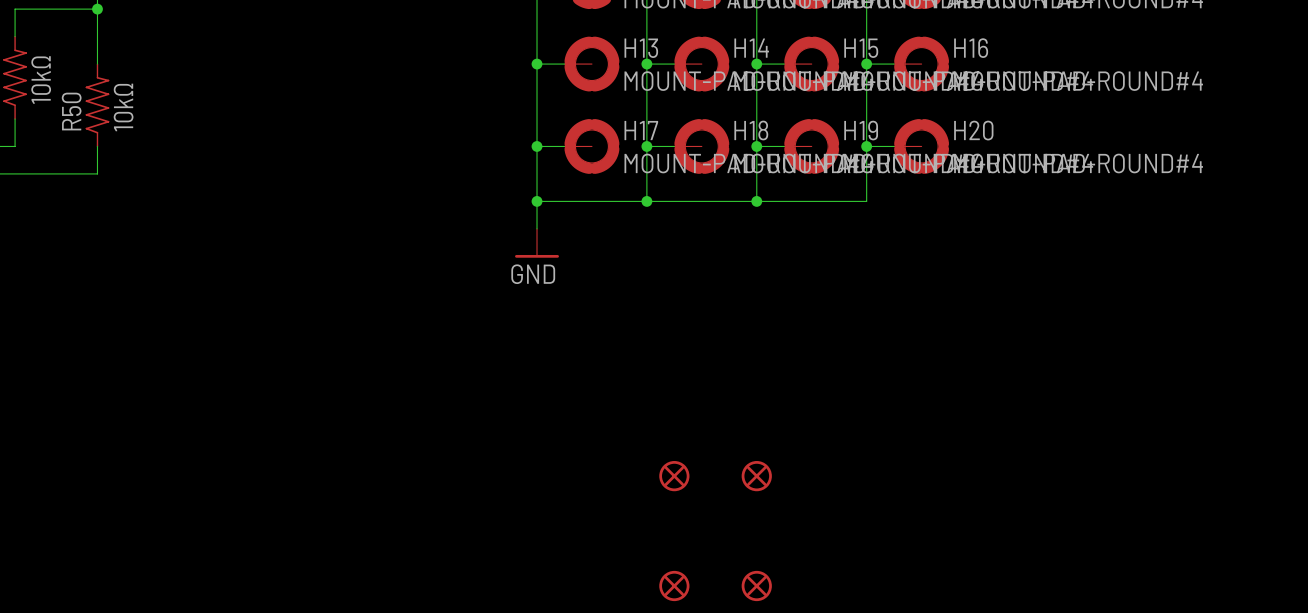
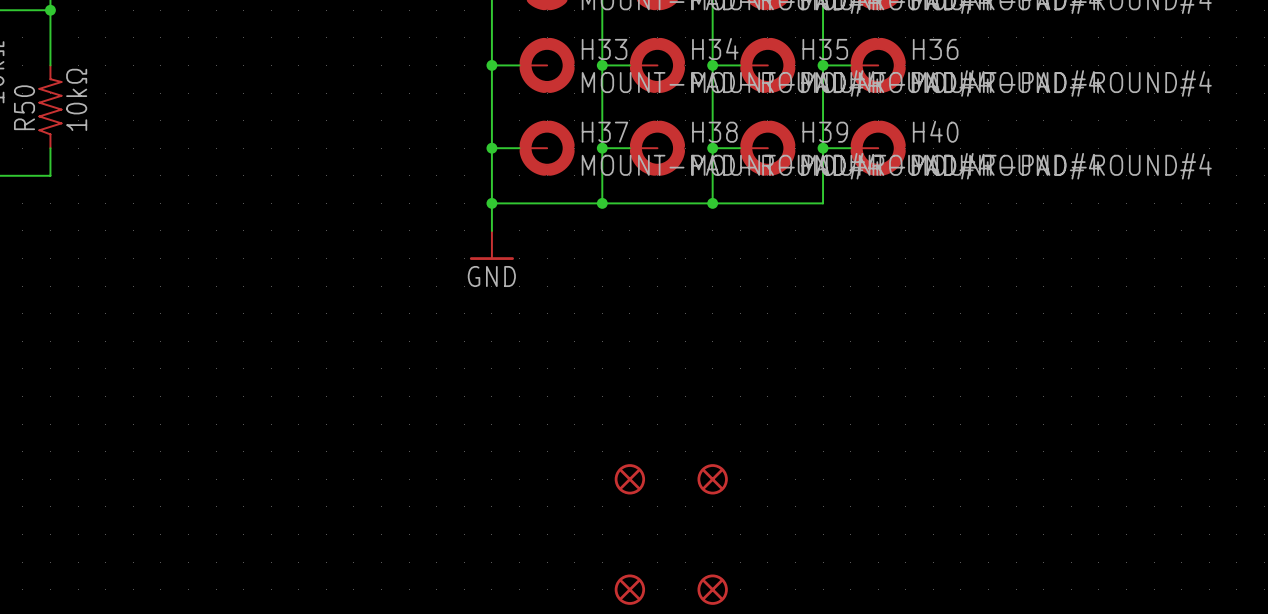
H13 name: H13 (641, 48) -> H33 (604, 49)
H14 name: H14 (751, 48) -> H34 (715, 48)
H15 name: H15 (861, 48) -> H35 (825, 49)
H16 name: H16 (971, 48) -> H36 (935, 49)
H17 name: H17 (641, 130) -> H37 (604, 132)
H18 name: H18 (751, 130) -> H38 (714, 132)
H19 name: H19 (861, 130) -> H39 (825, 132)
H20 name: H20 (973, 130) -> H40 (935, 131)

